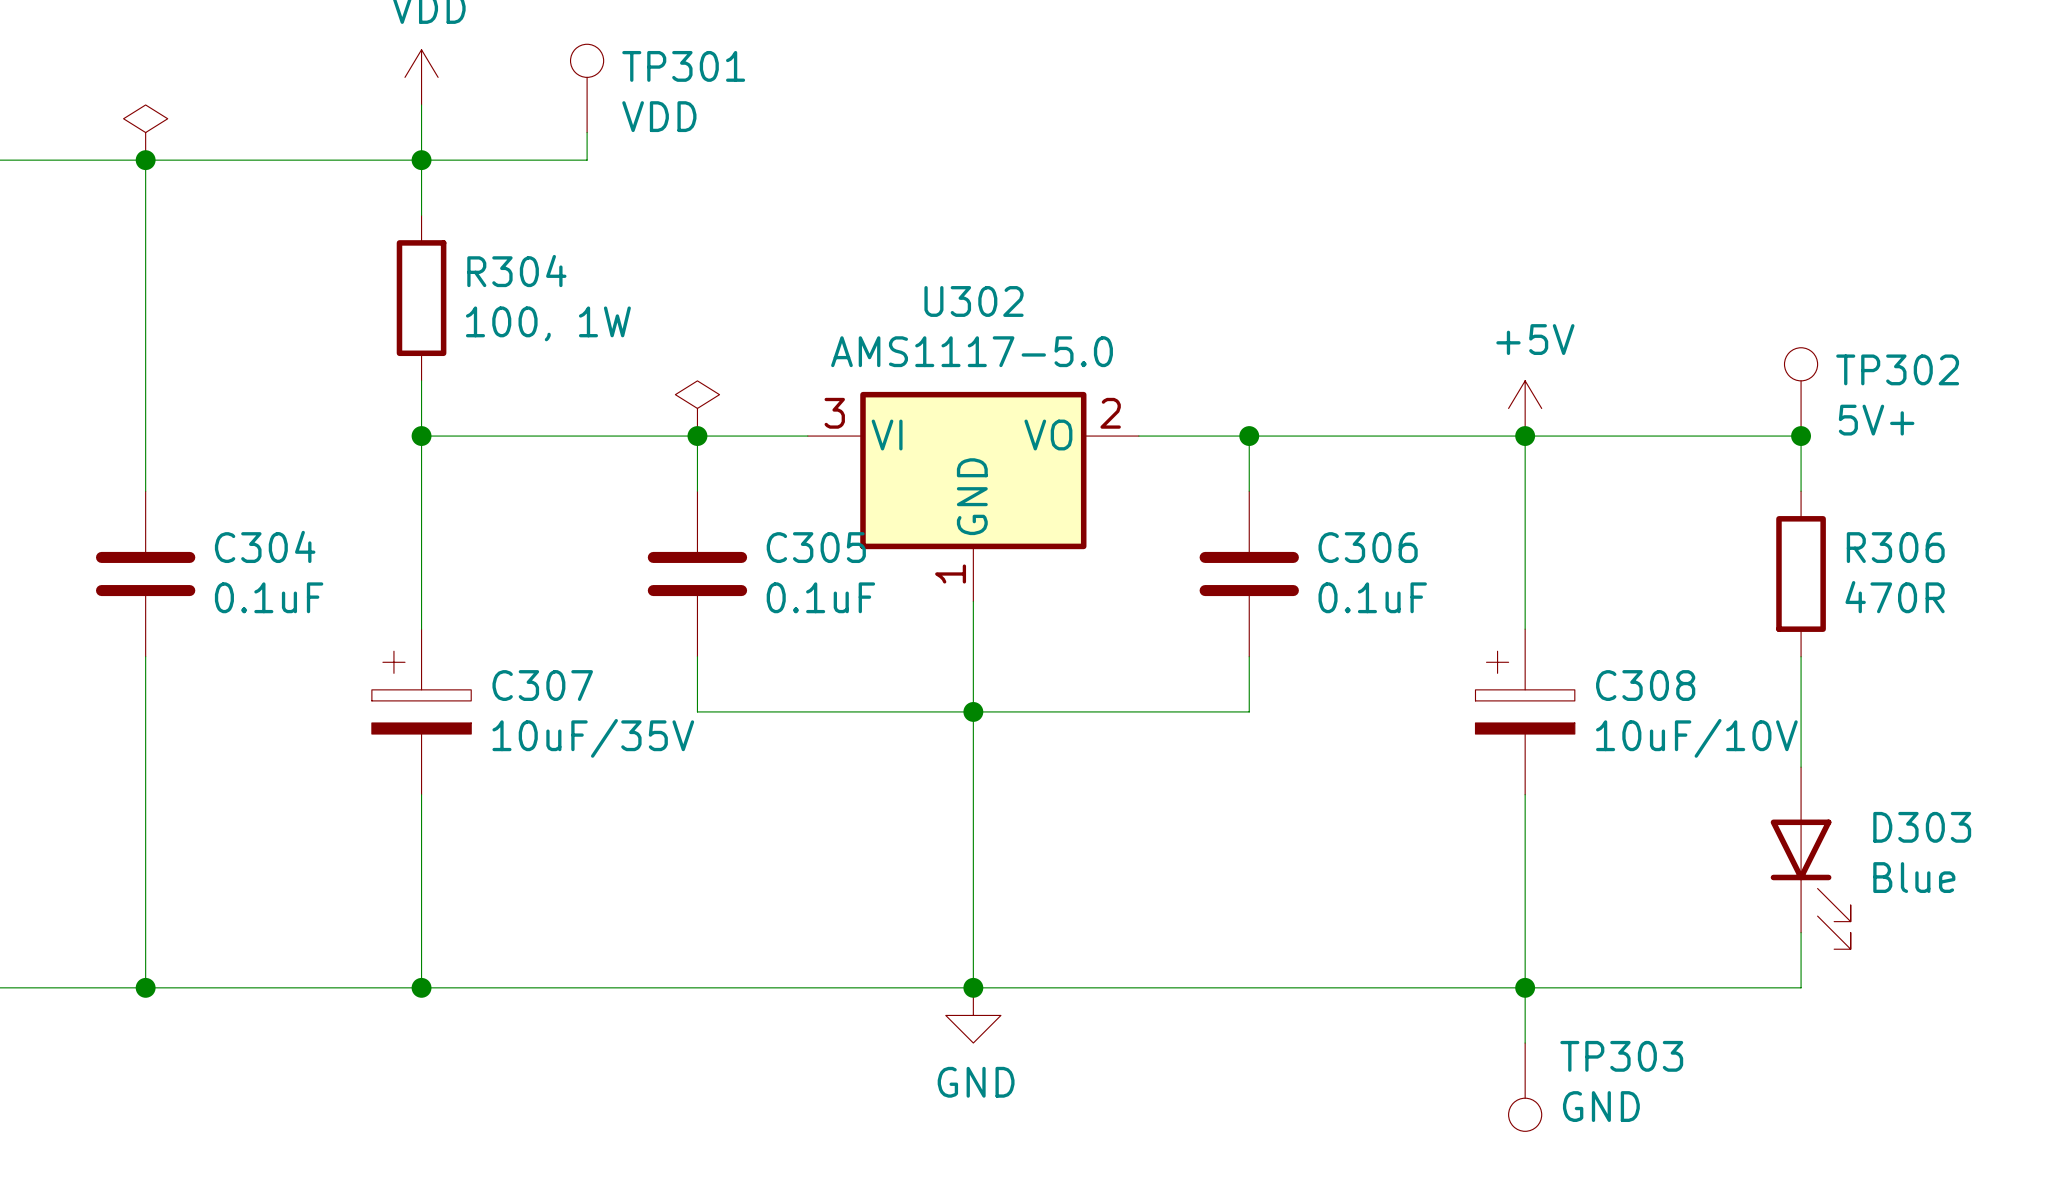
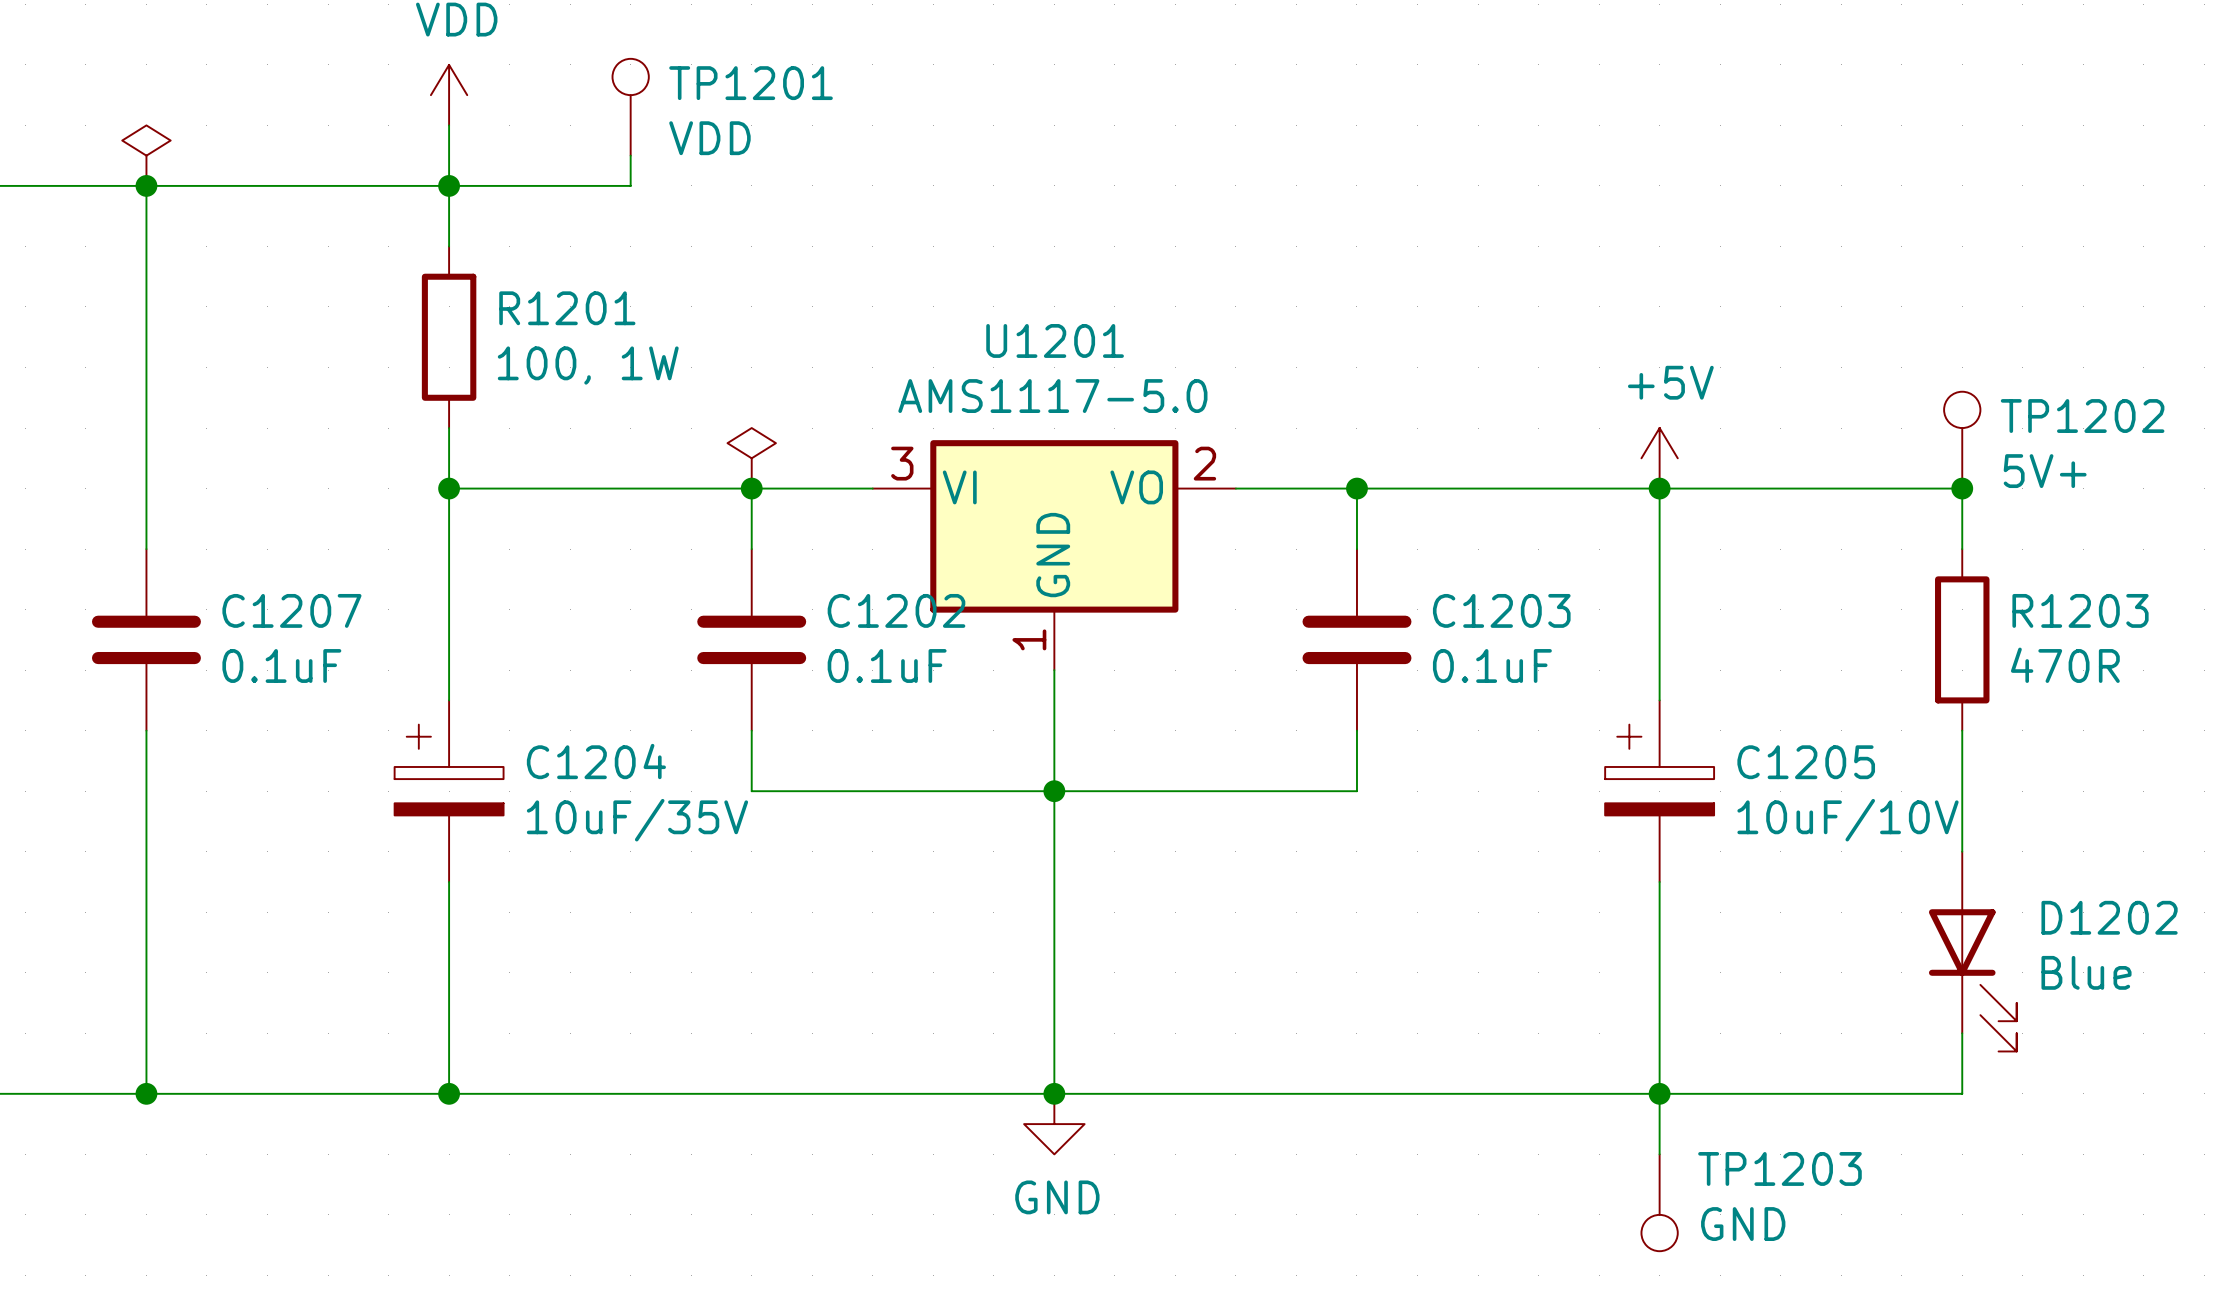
TP301 name: TP301 (683, 66) -> TP1201 (751, 83)
R304 name: R304 (516, 271) -> R1201 (567, 308)
U302 name: U302 (974, 301) -> U1201 (1055, 340)
TP302 name: TP302 (1897, 369) -> TP1202 (2082, 416)
C304 name: C304 (265, 546) -> C1207 (291, 610)
C305 name: C305 (816, 547) -> C1202 (896, 610)
C306 name: C306 (1368, 547) -> C1203 (1501, 610)
R306 name: R306 (1895, 547) -> R1203 (2080, 610)
C307 name: C307 (542, 685) -> C1204 (596, 761)
C308 name: C308 (1645, 685) -> C1205 (1806, 762)
D303 name: D303 (1922, 827) -> D1202 (2109, 917)
TP303 name: TP303 (1621, 1056) -> TP1203 (1779, 1168)

